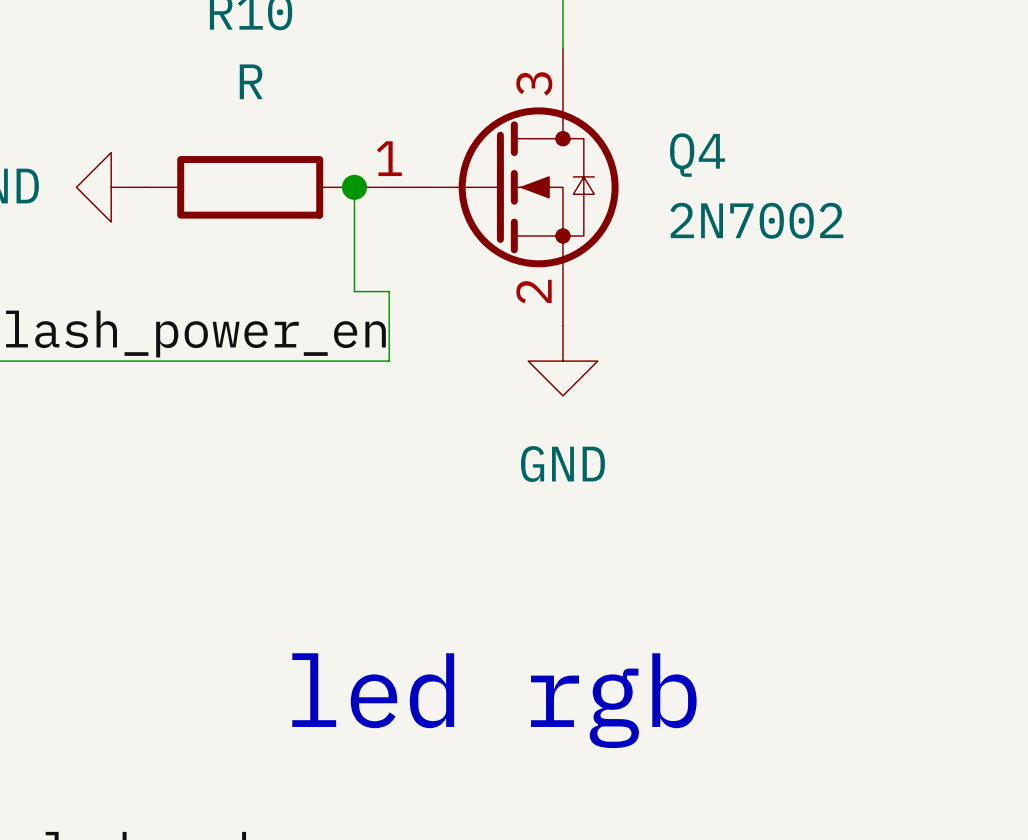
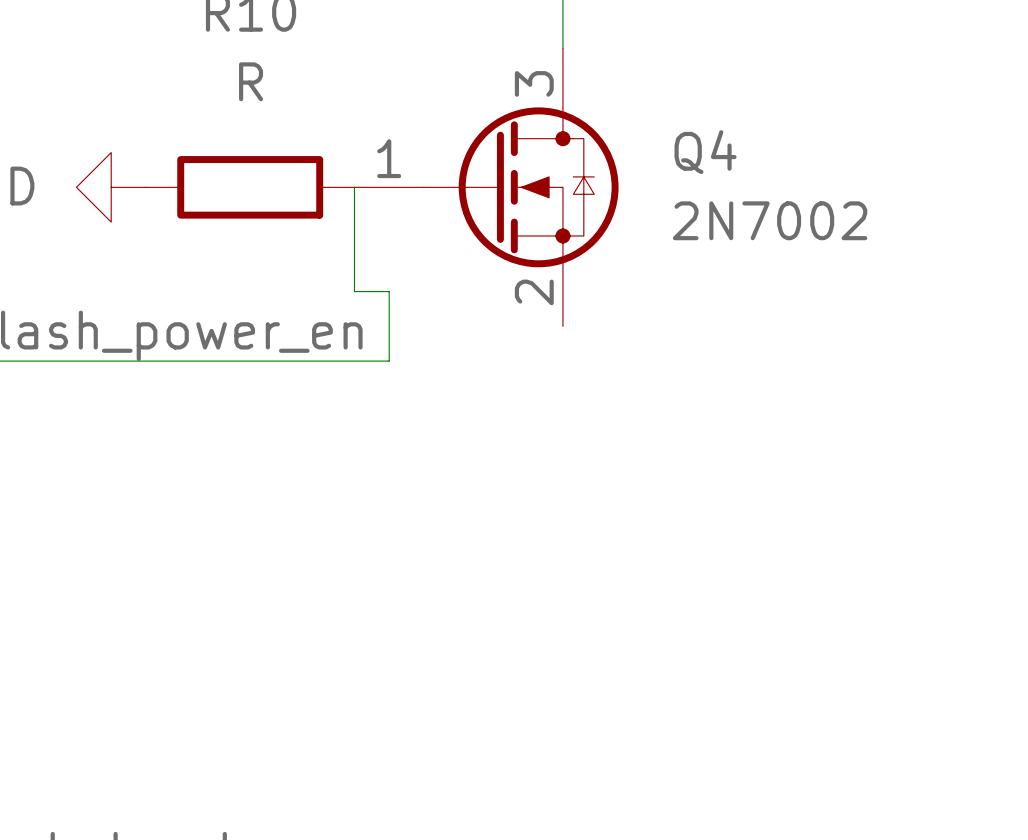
junction: (354, 187) -> none
power symbol: GND (562, 361) -> none
text: led rgb (494, 700) -> none

